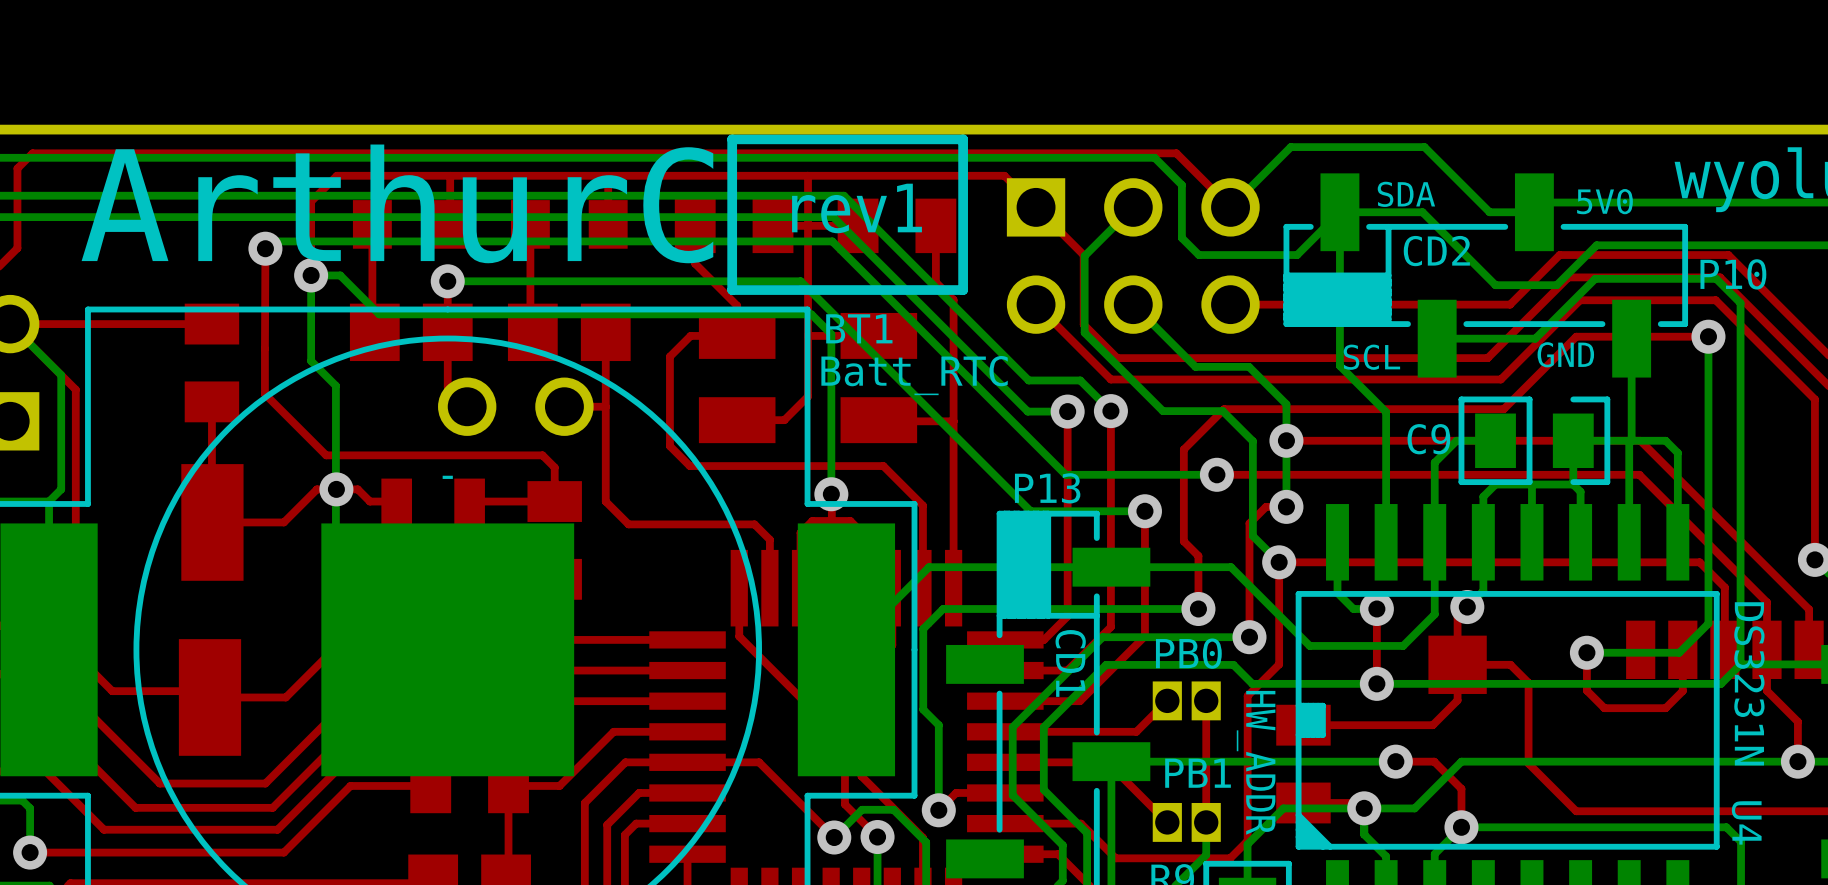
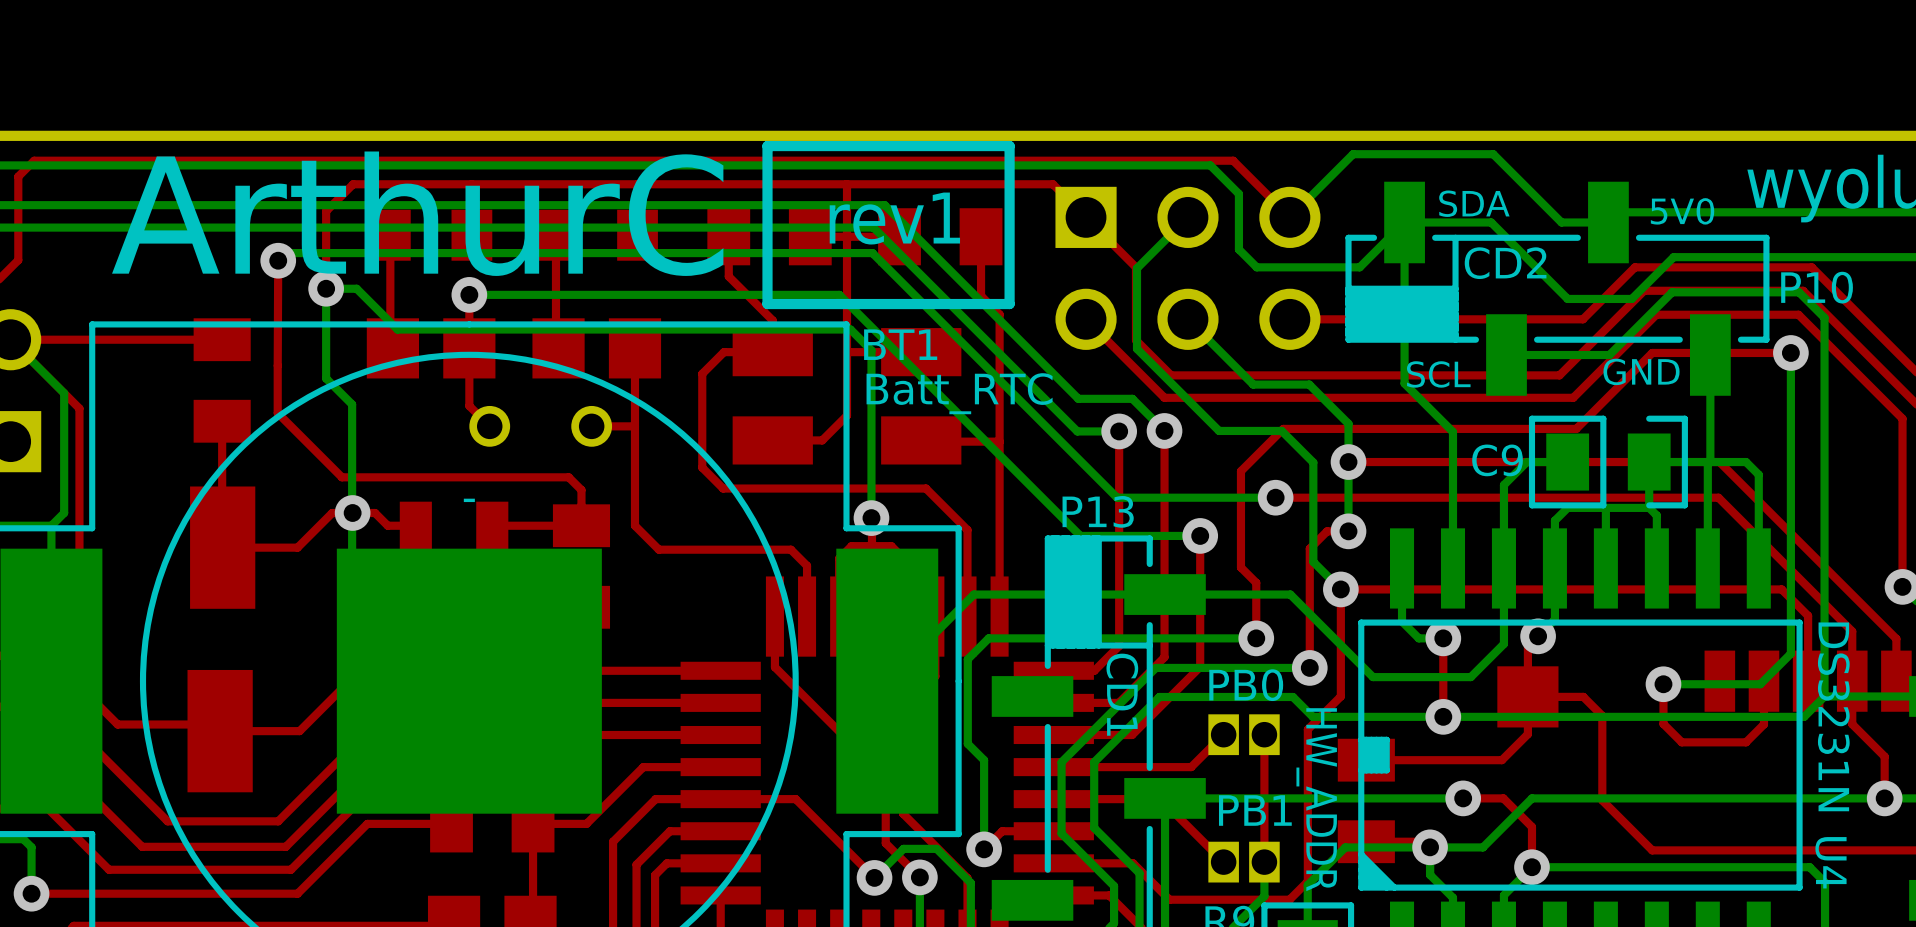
part footprint: [438, 377, 497, 436] -> [469, 405, 511, 447]
part footprint: [535, 377, 594, 436] -> [571, 405, 613, 447]

